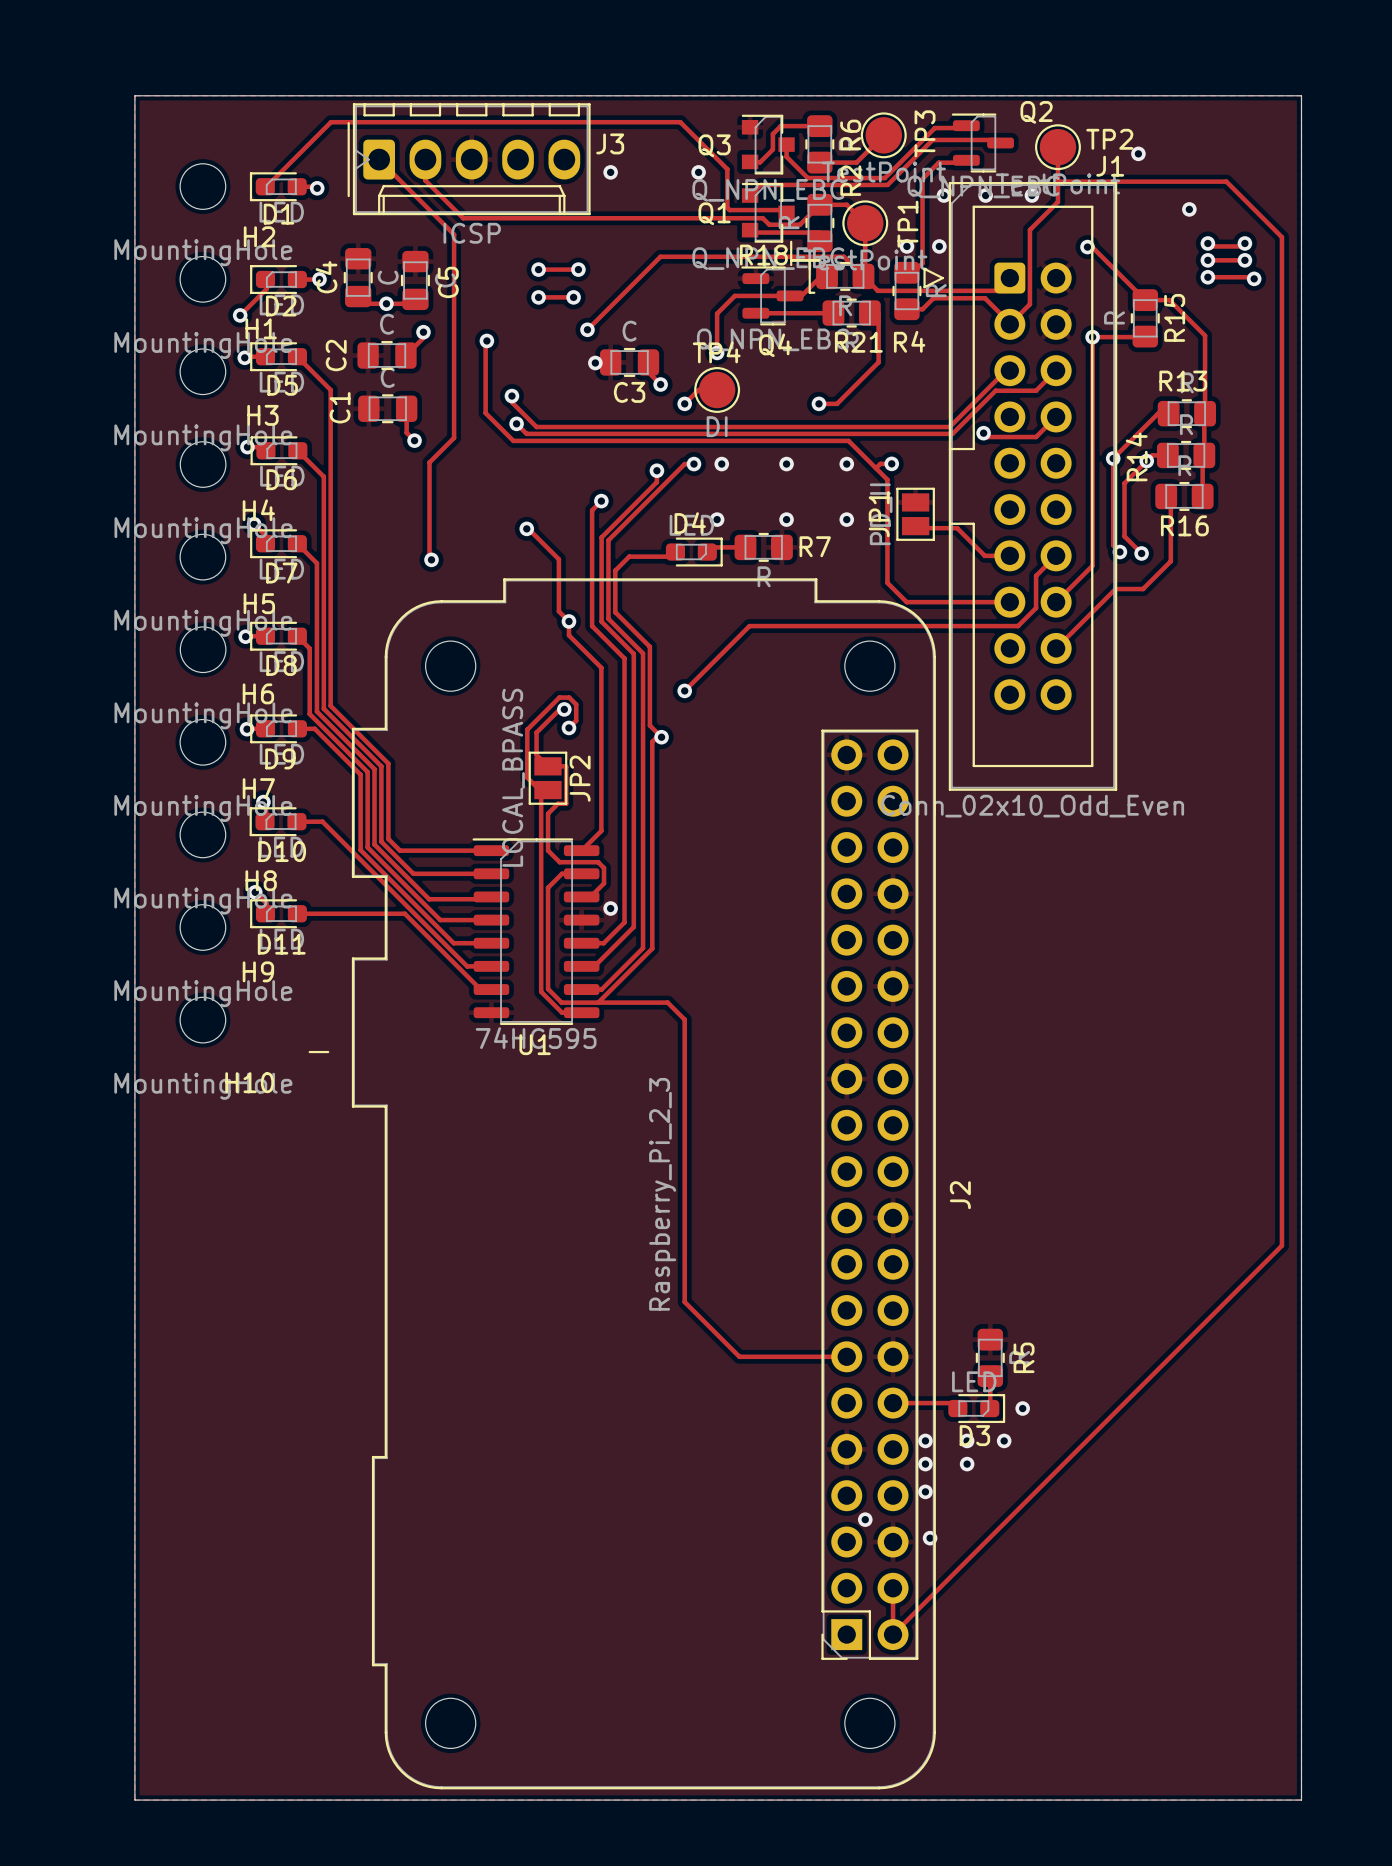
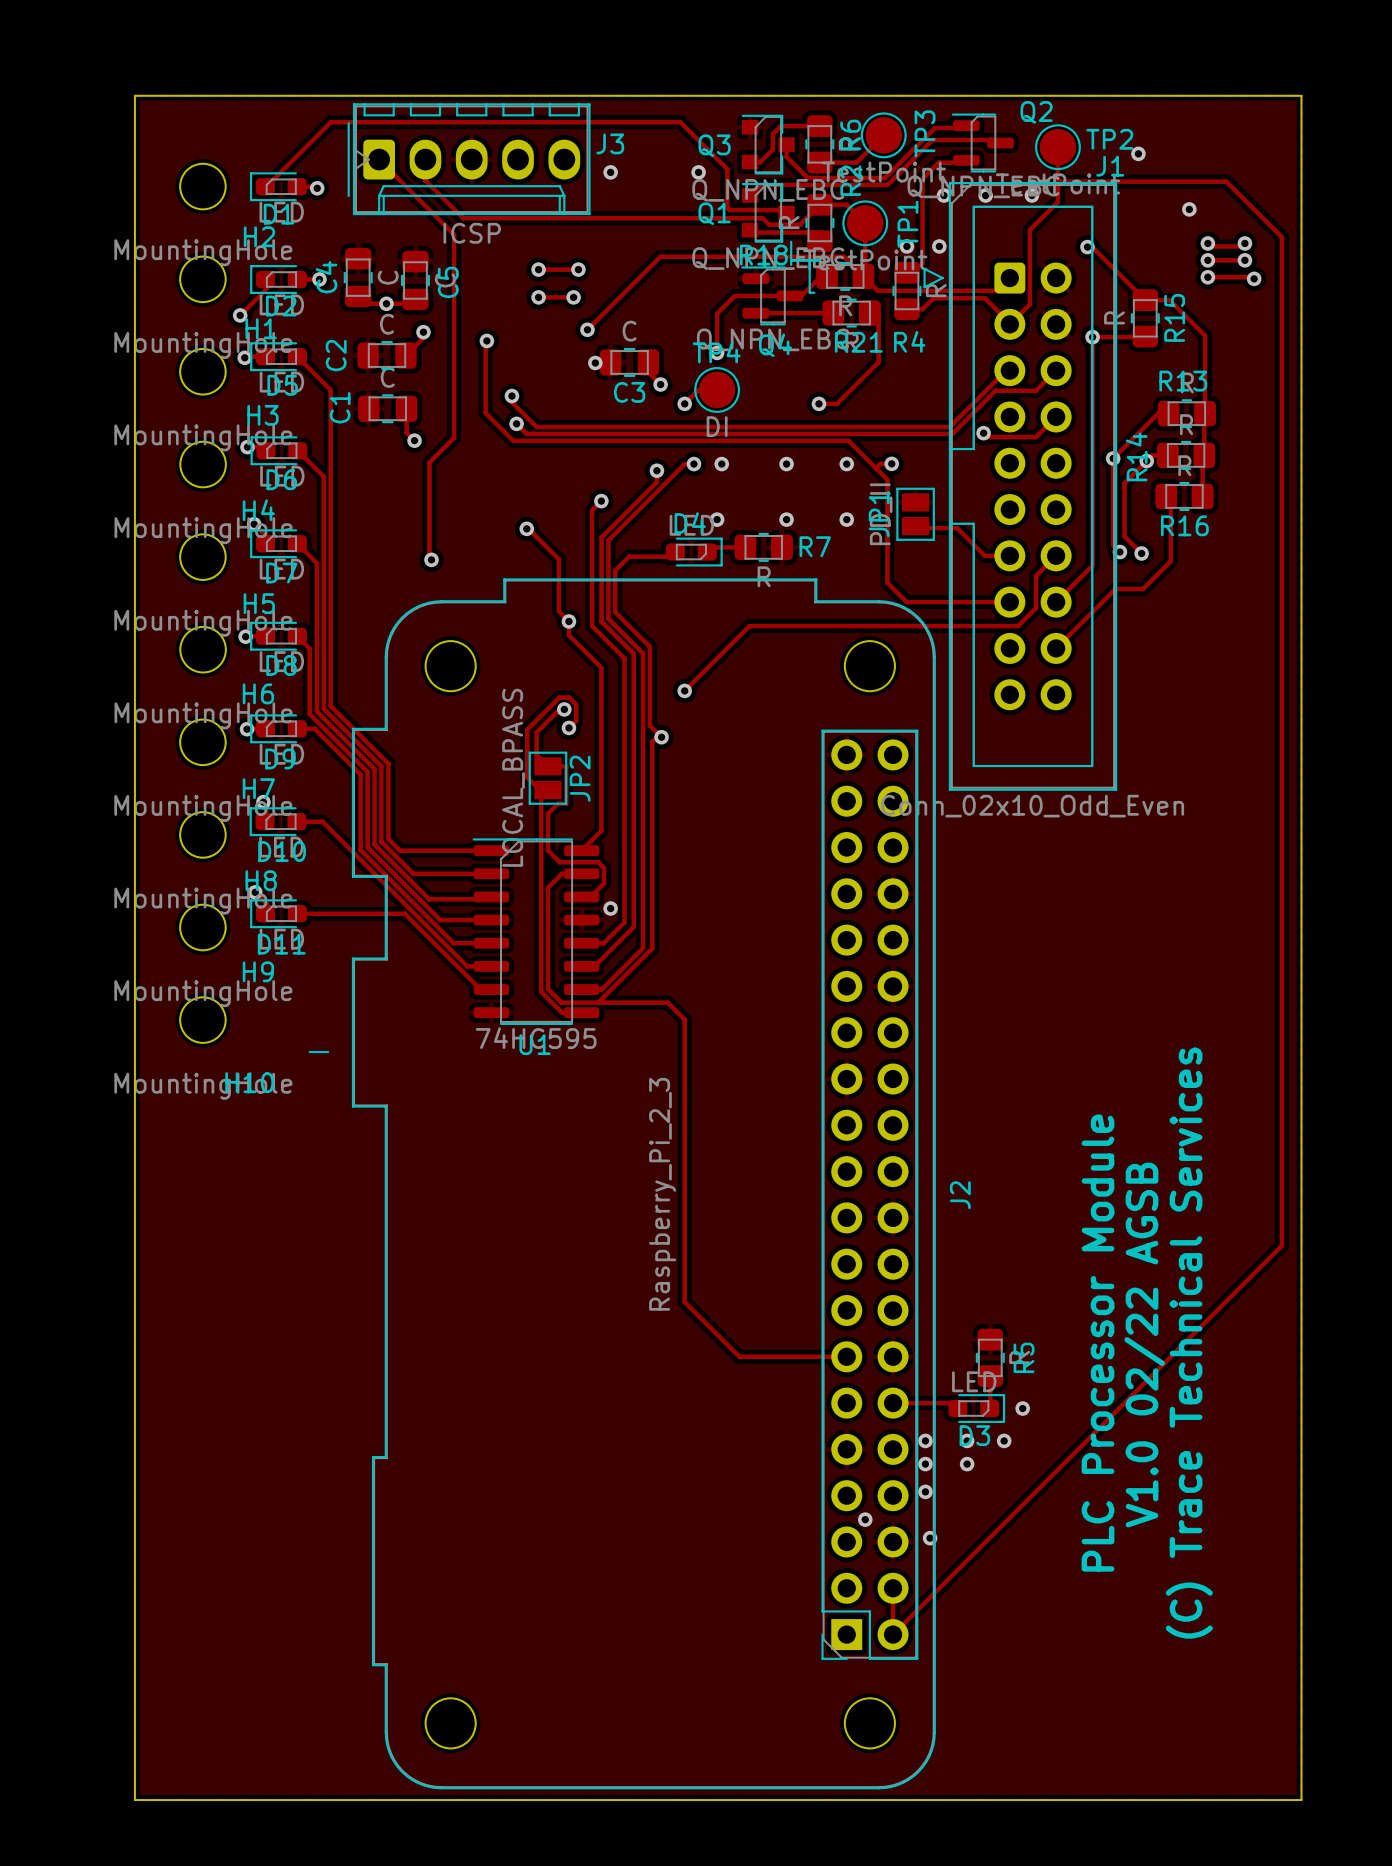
text: none -> PLC Processor Module (1098, 1343)
text: none -> (C) Trace Technical Services (1189, 1343)
text: none -> V1.0 02/22 AGSB (1144, 1345)

